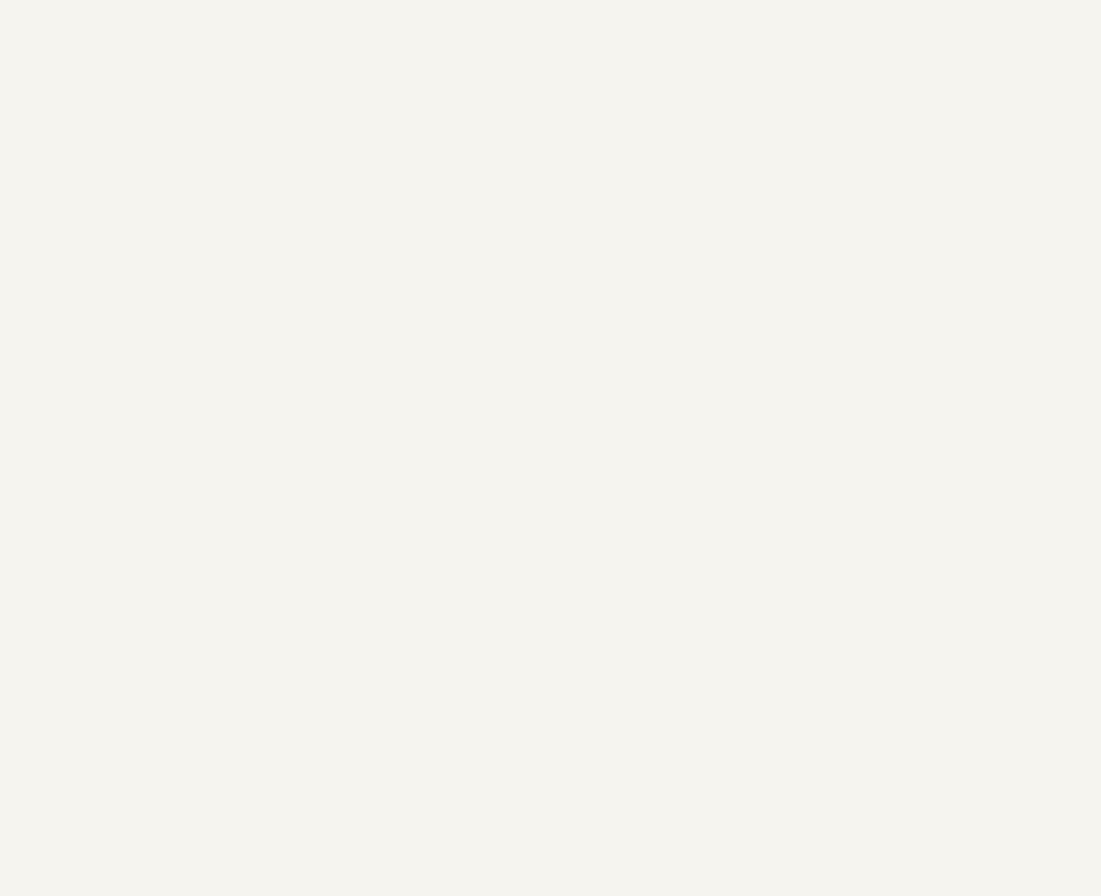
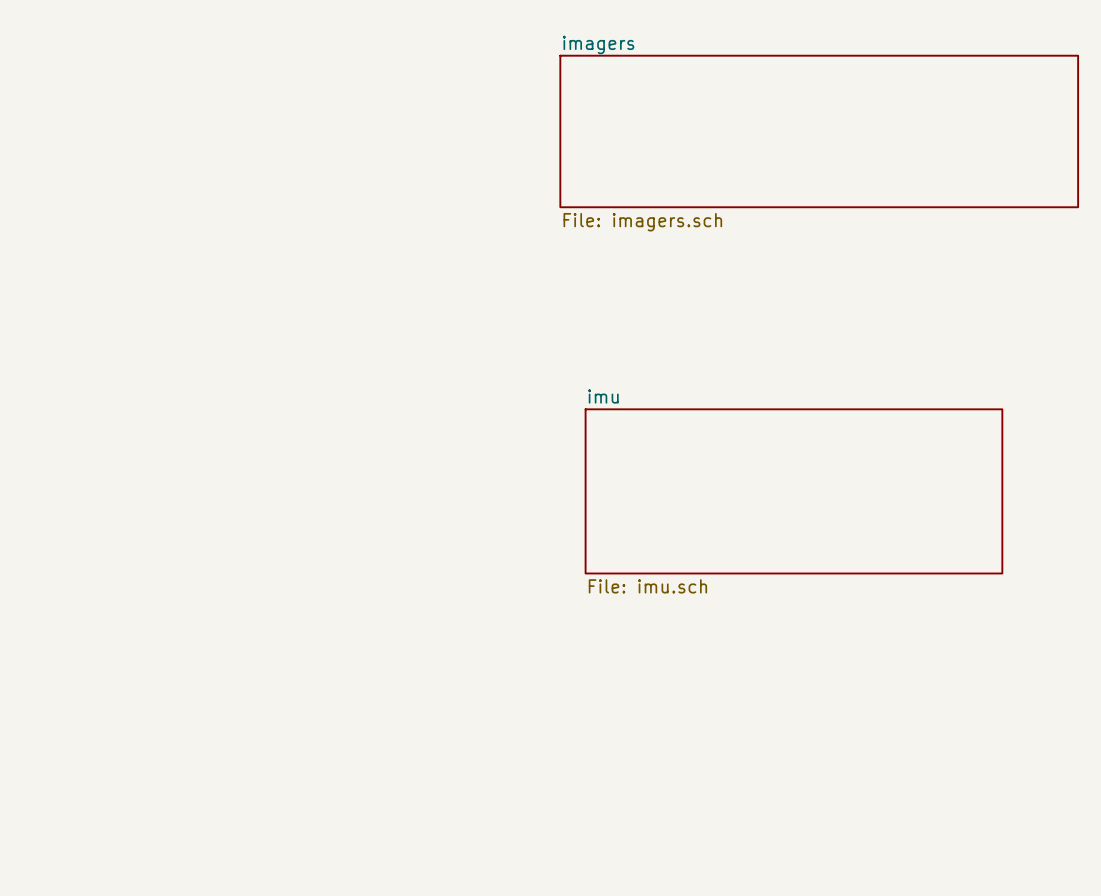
sheet imagers: none -> File: imagers.sch (819, 131)
sheet imu: none -> File: imu.sch (793, 491)

